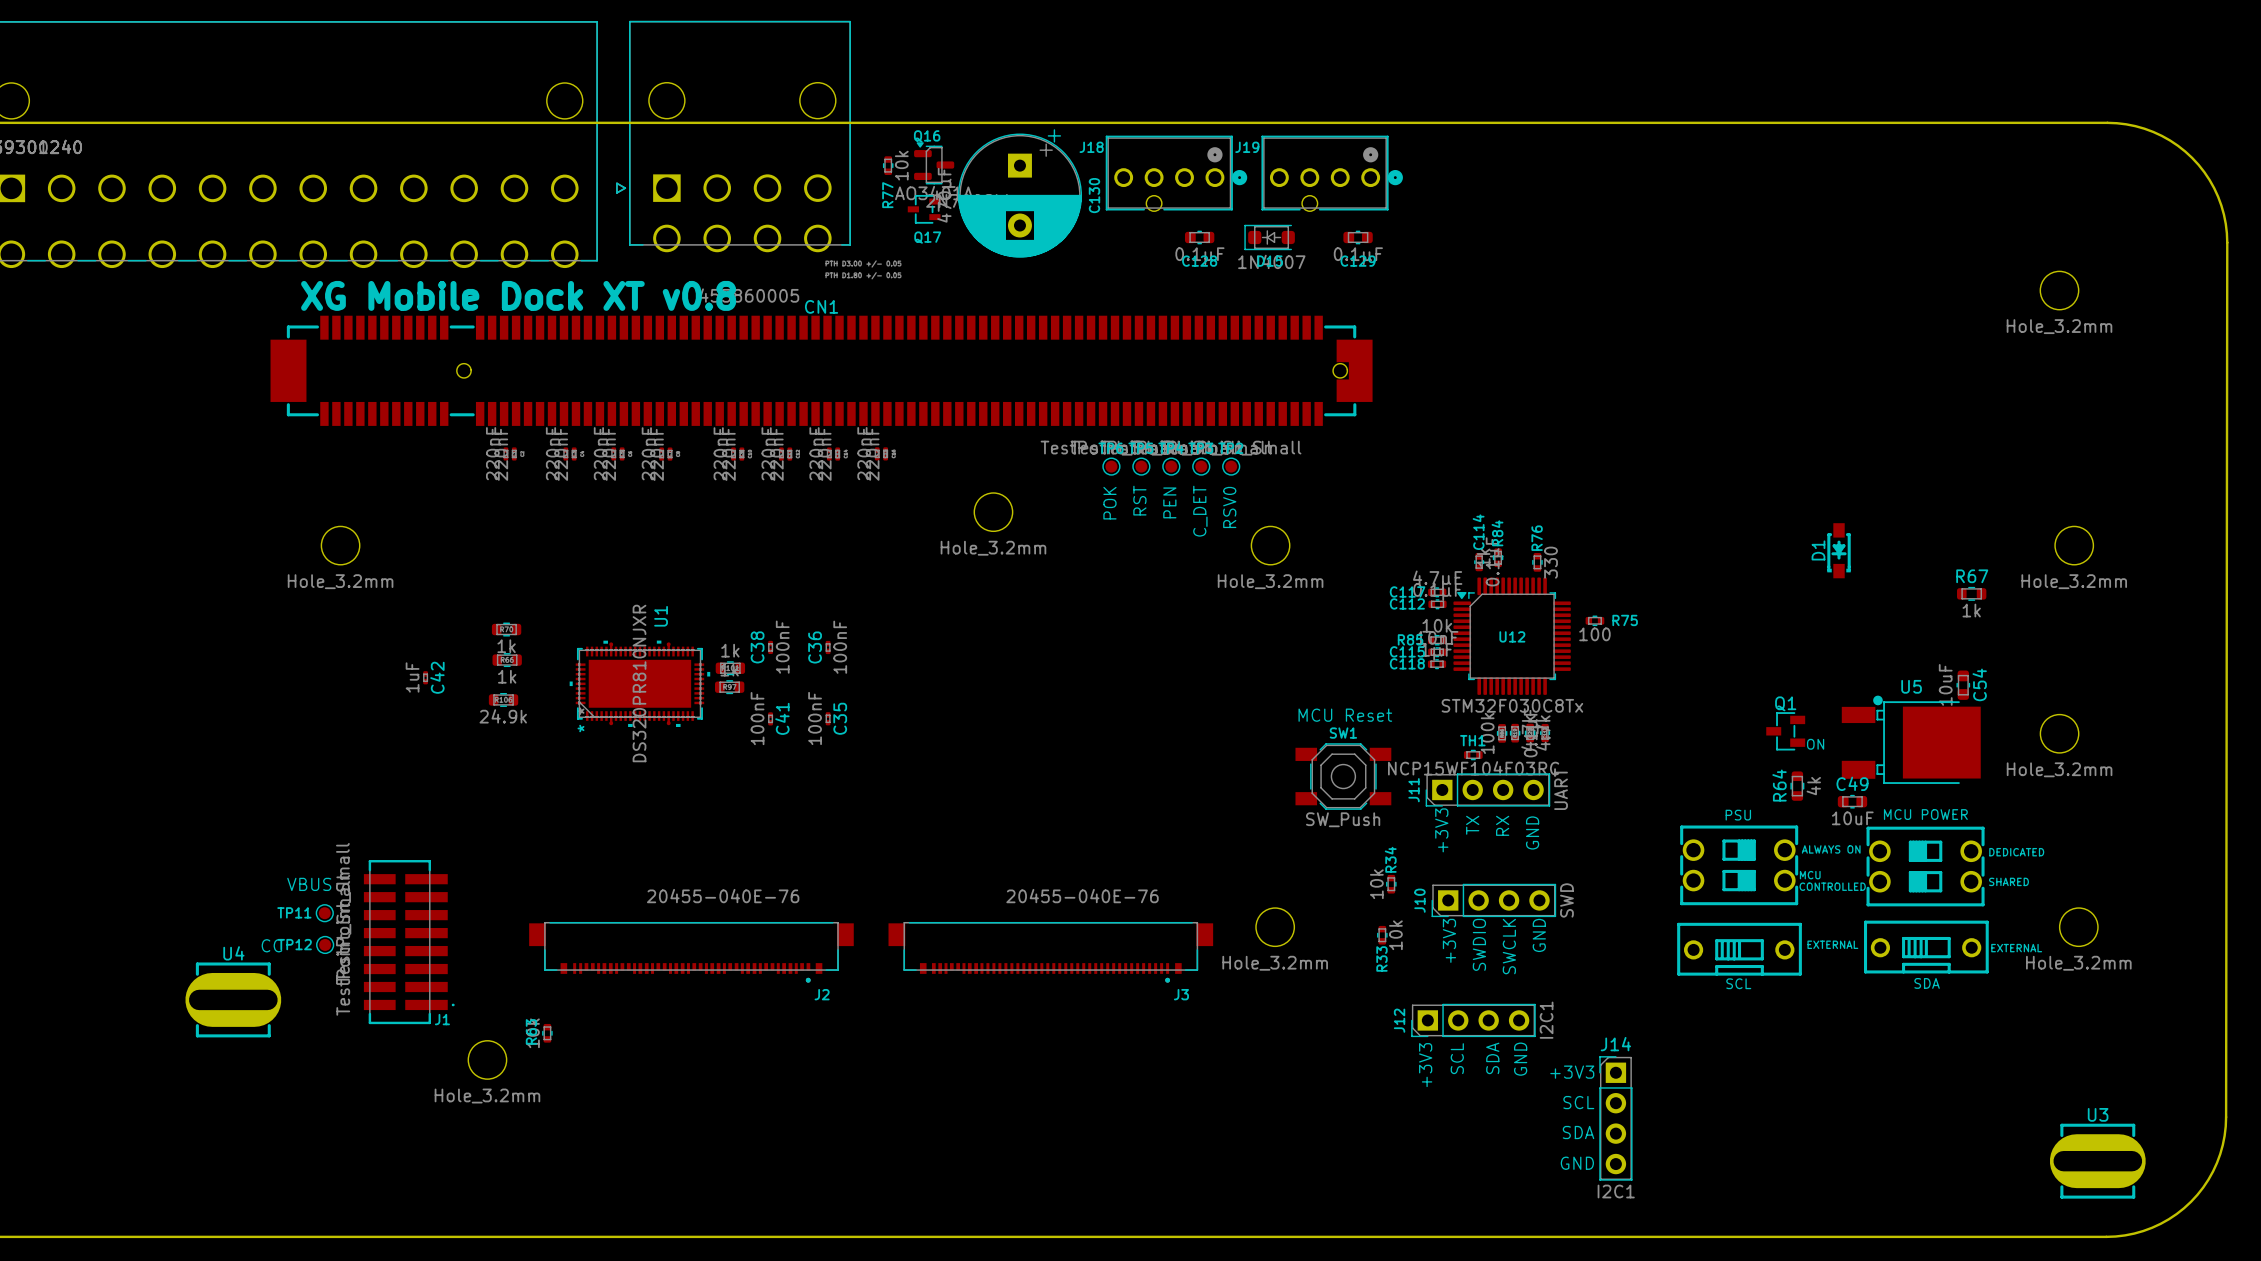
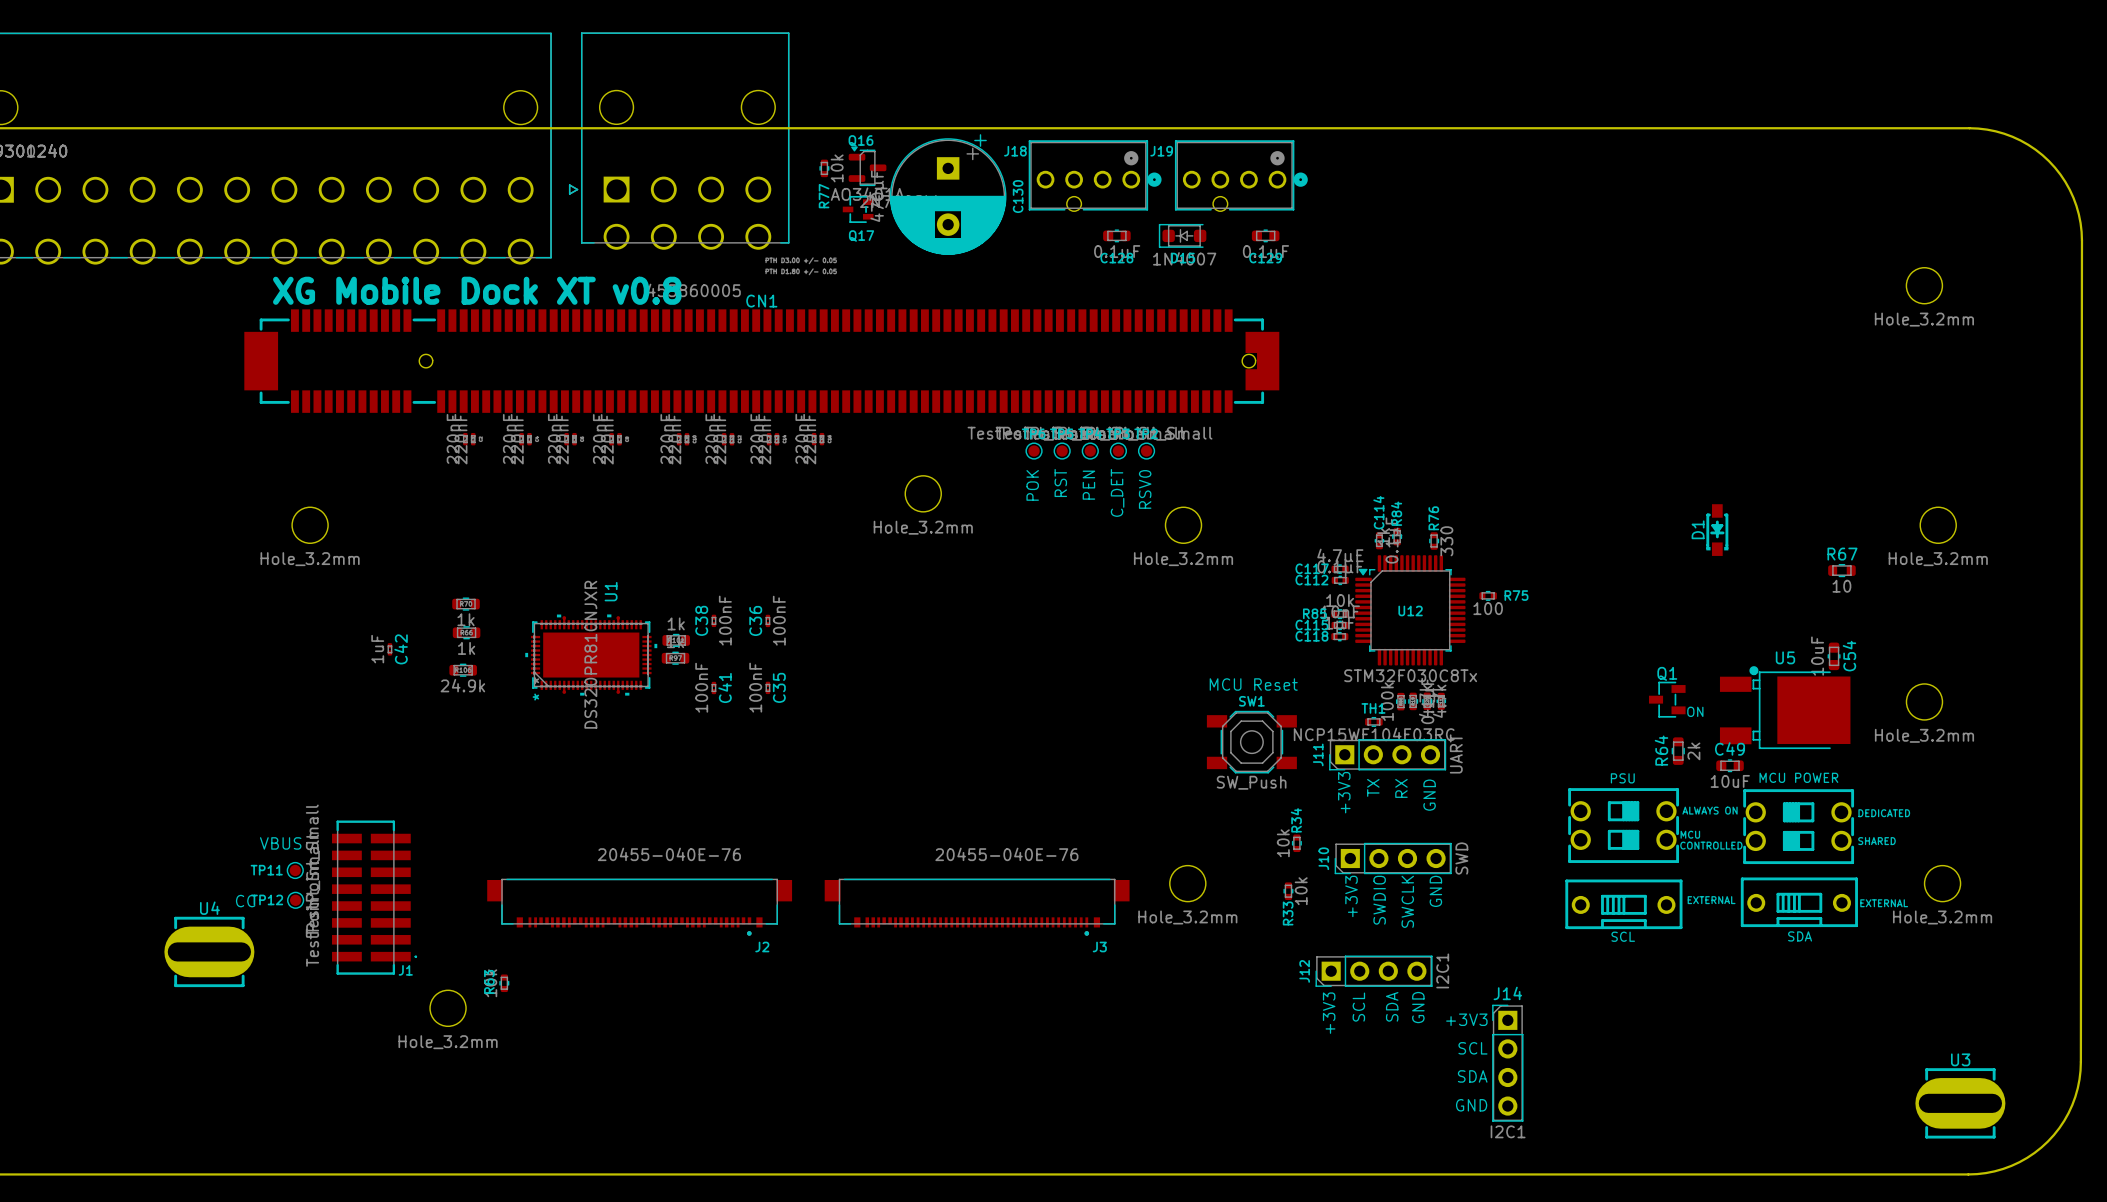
R67 value: 1k (1971, 610) -> 10 (1841, 586)
R64 value: 4k (1813, 786) -> 2k (1693, 751)

